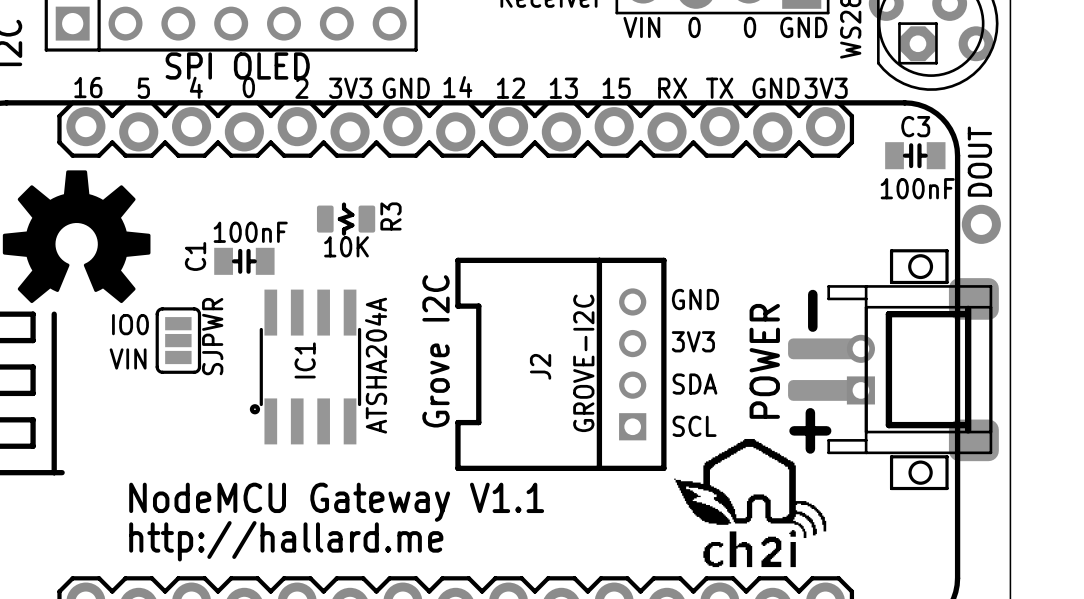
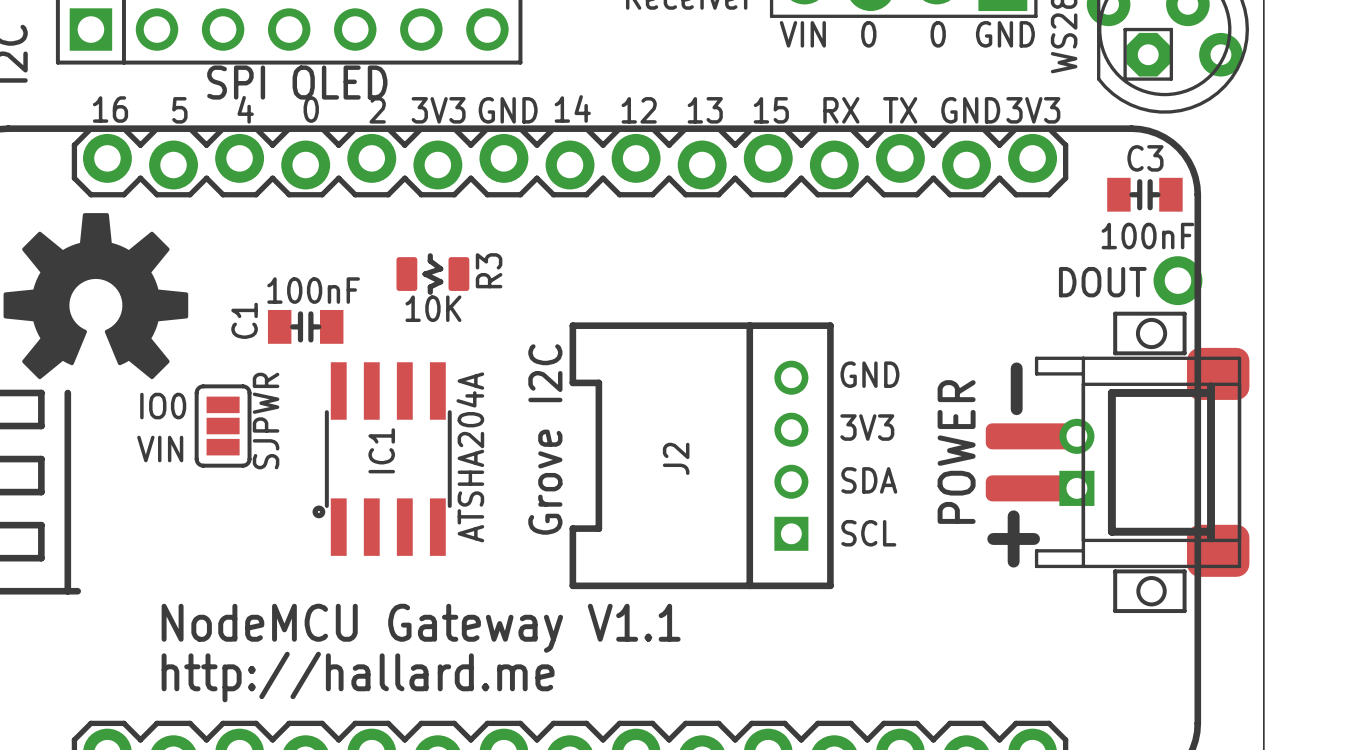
text rotation: 0° (979, 161) -> 90° clockwise (1102, 282)
text position: DOUT (979, 161) -> DOUT (1102, 282)
part position: (981, 224) -> (1177, 280)
J2 value: GROVE-I2C (583, 363) -> none
drawing: [674, 438, 827, 568] -> none

